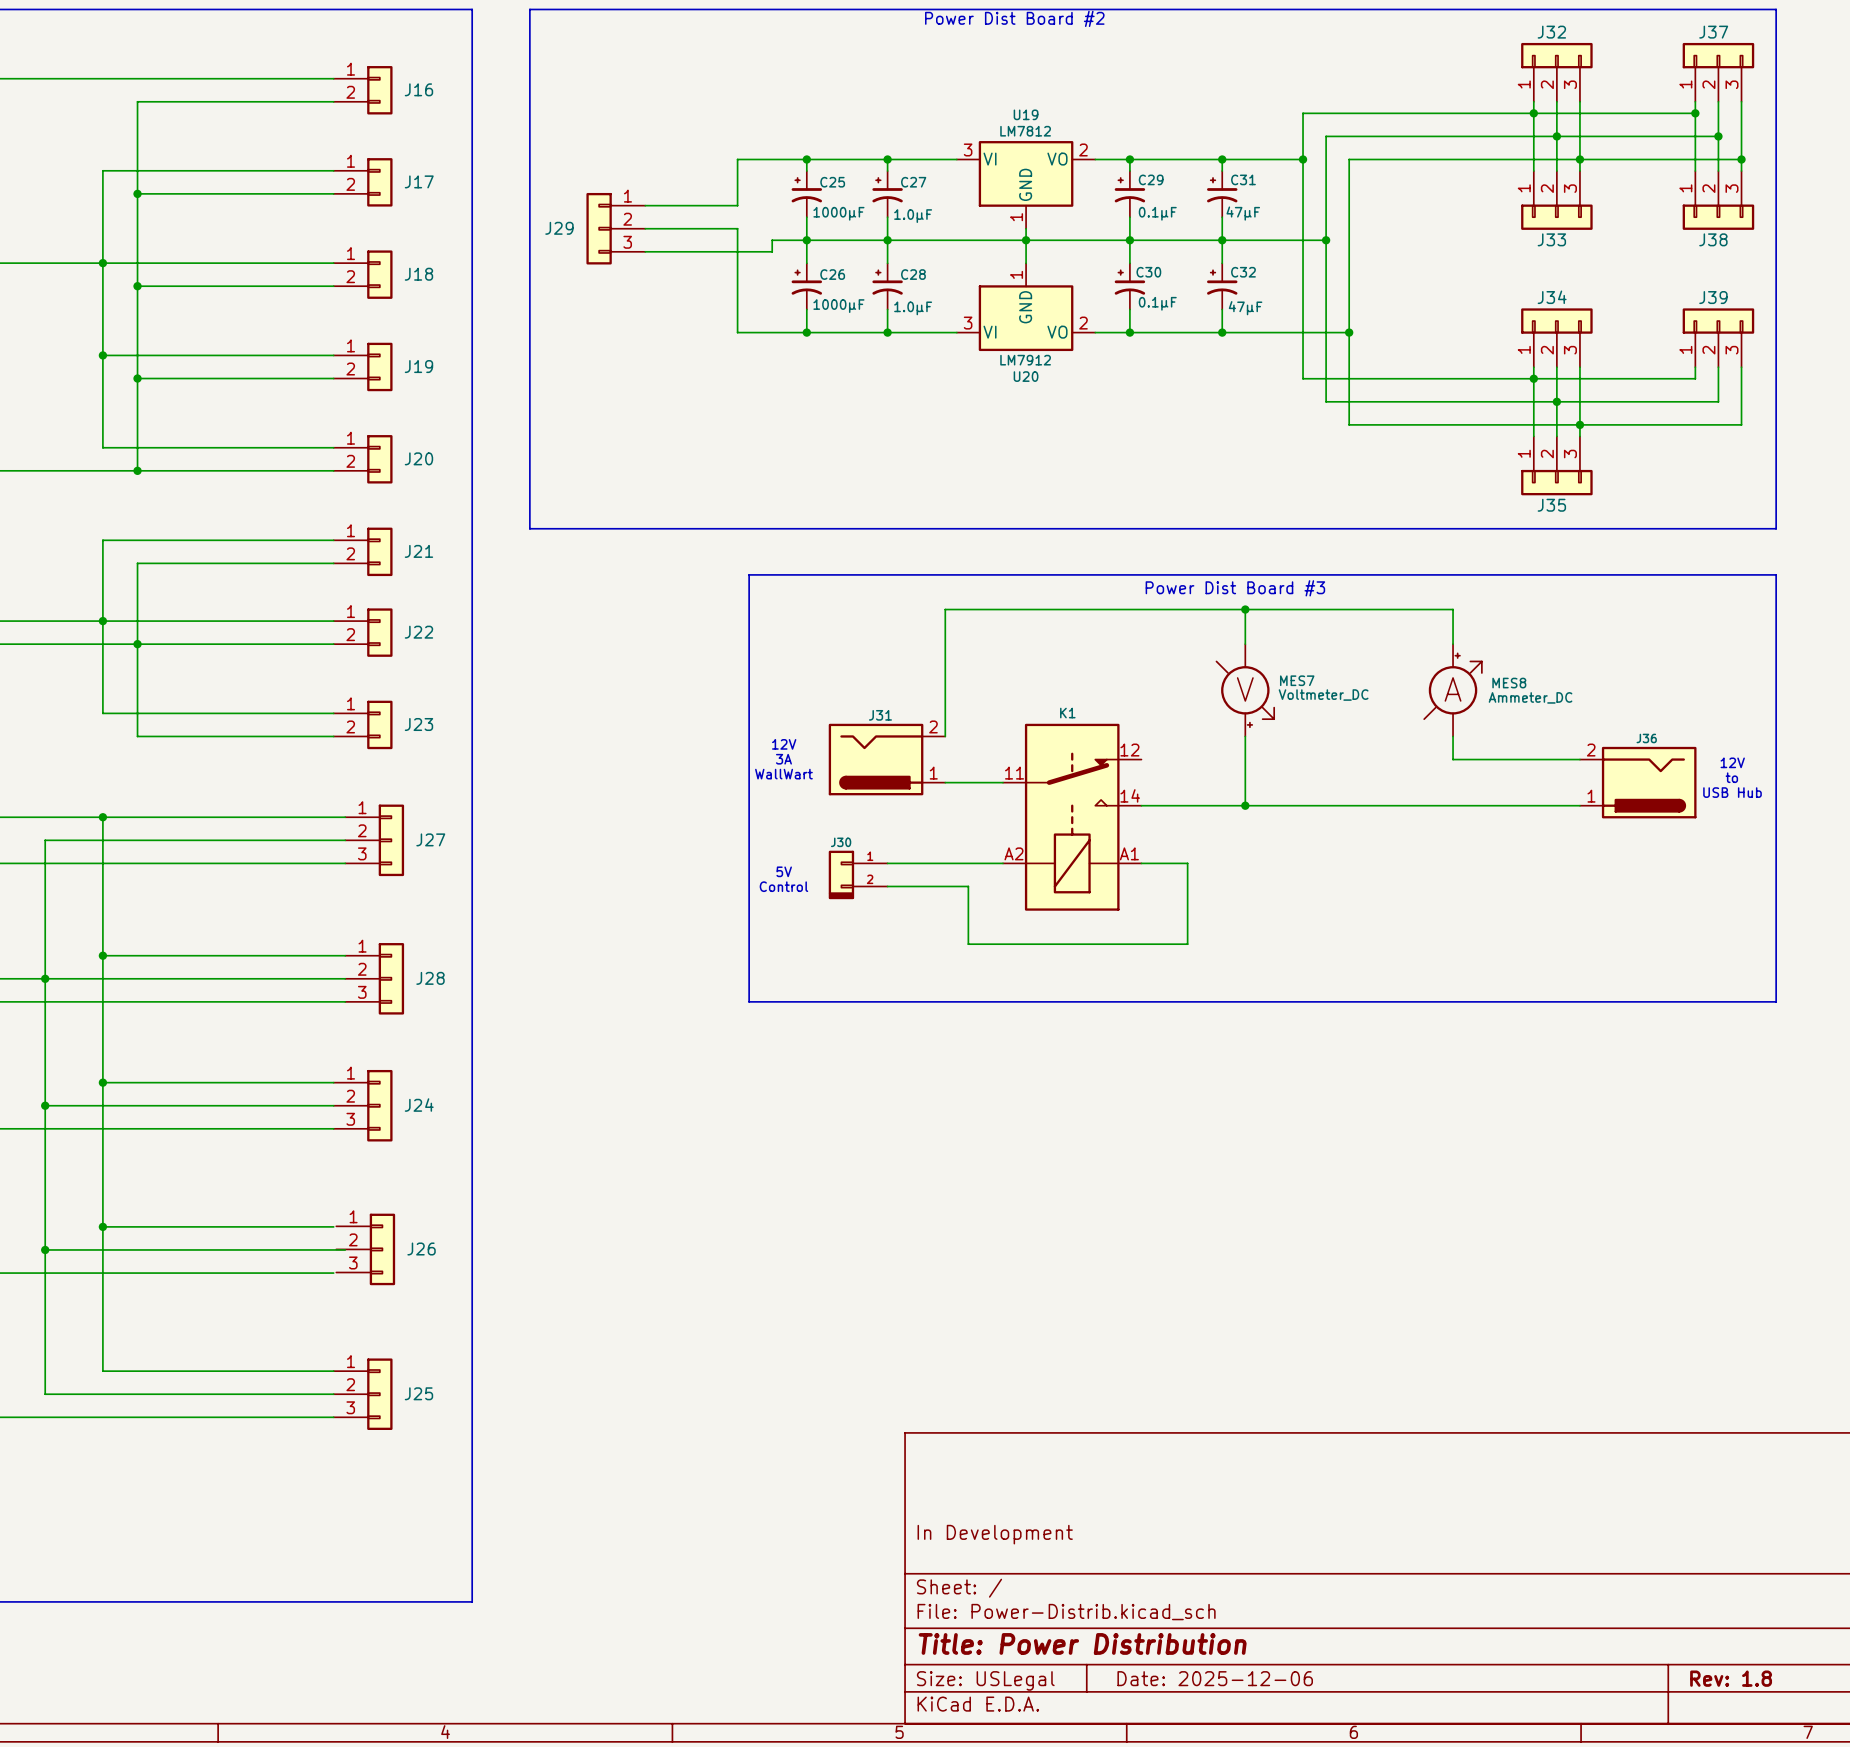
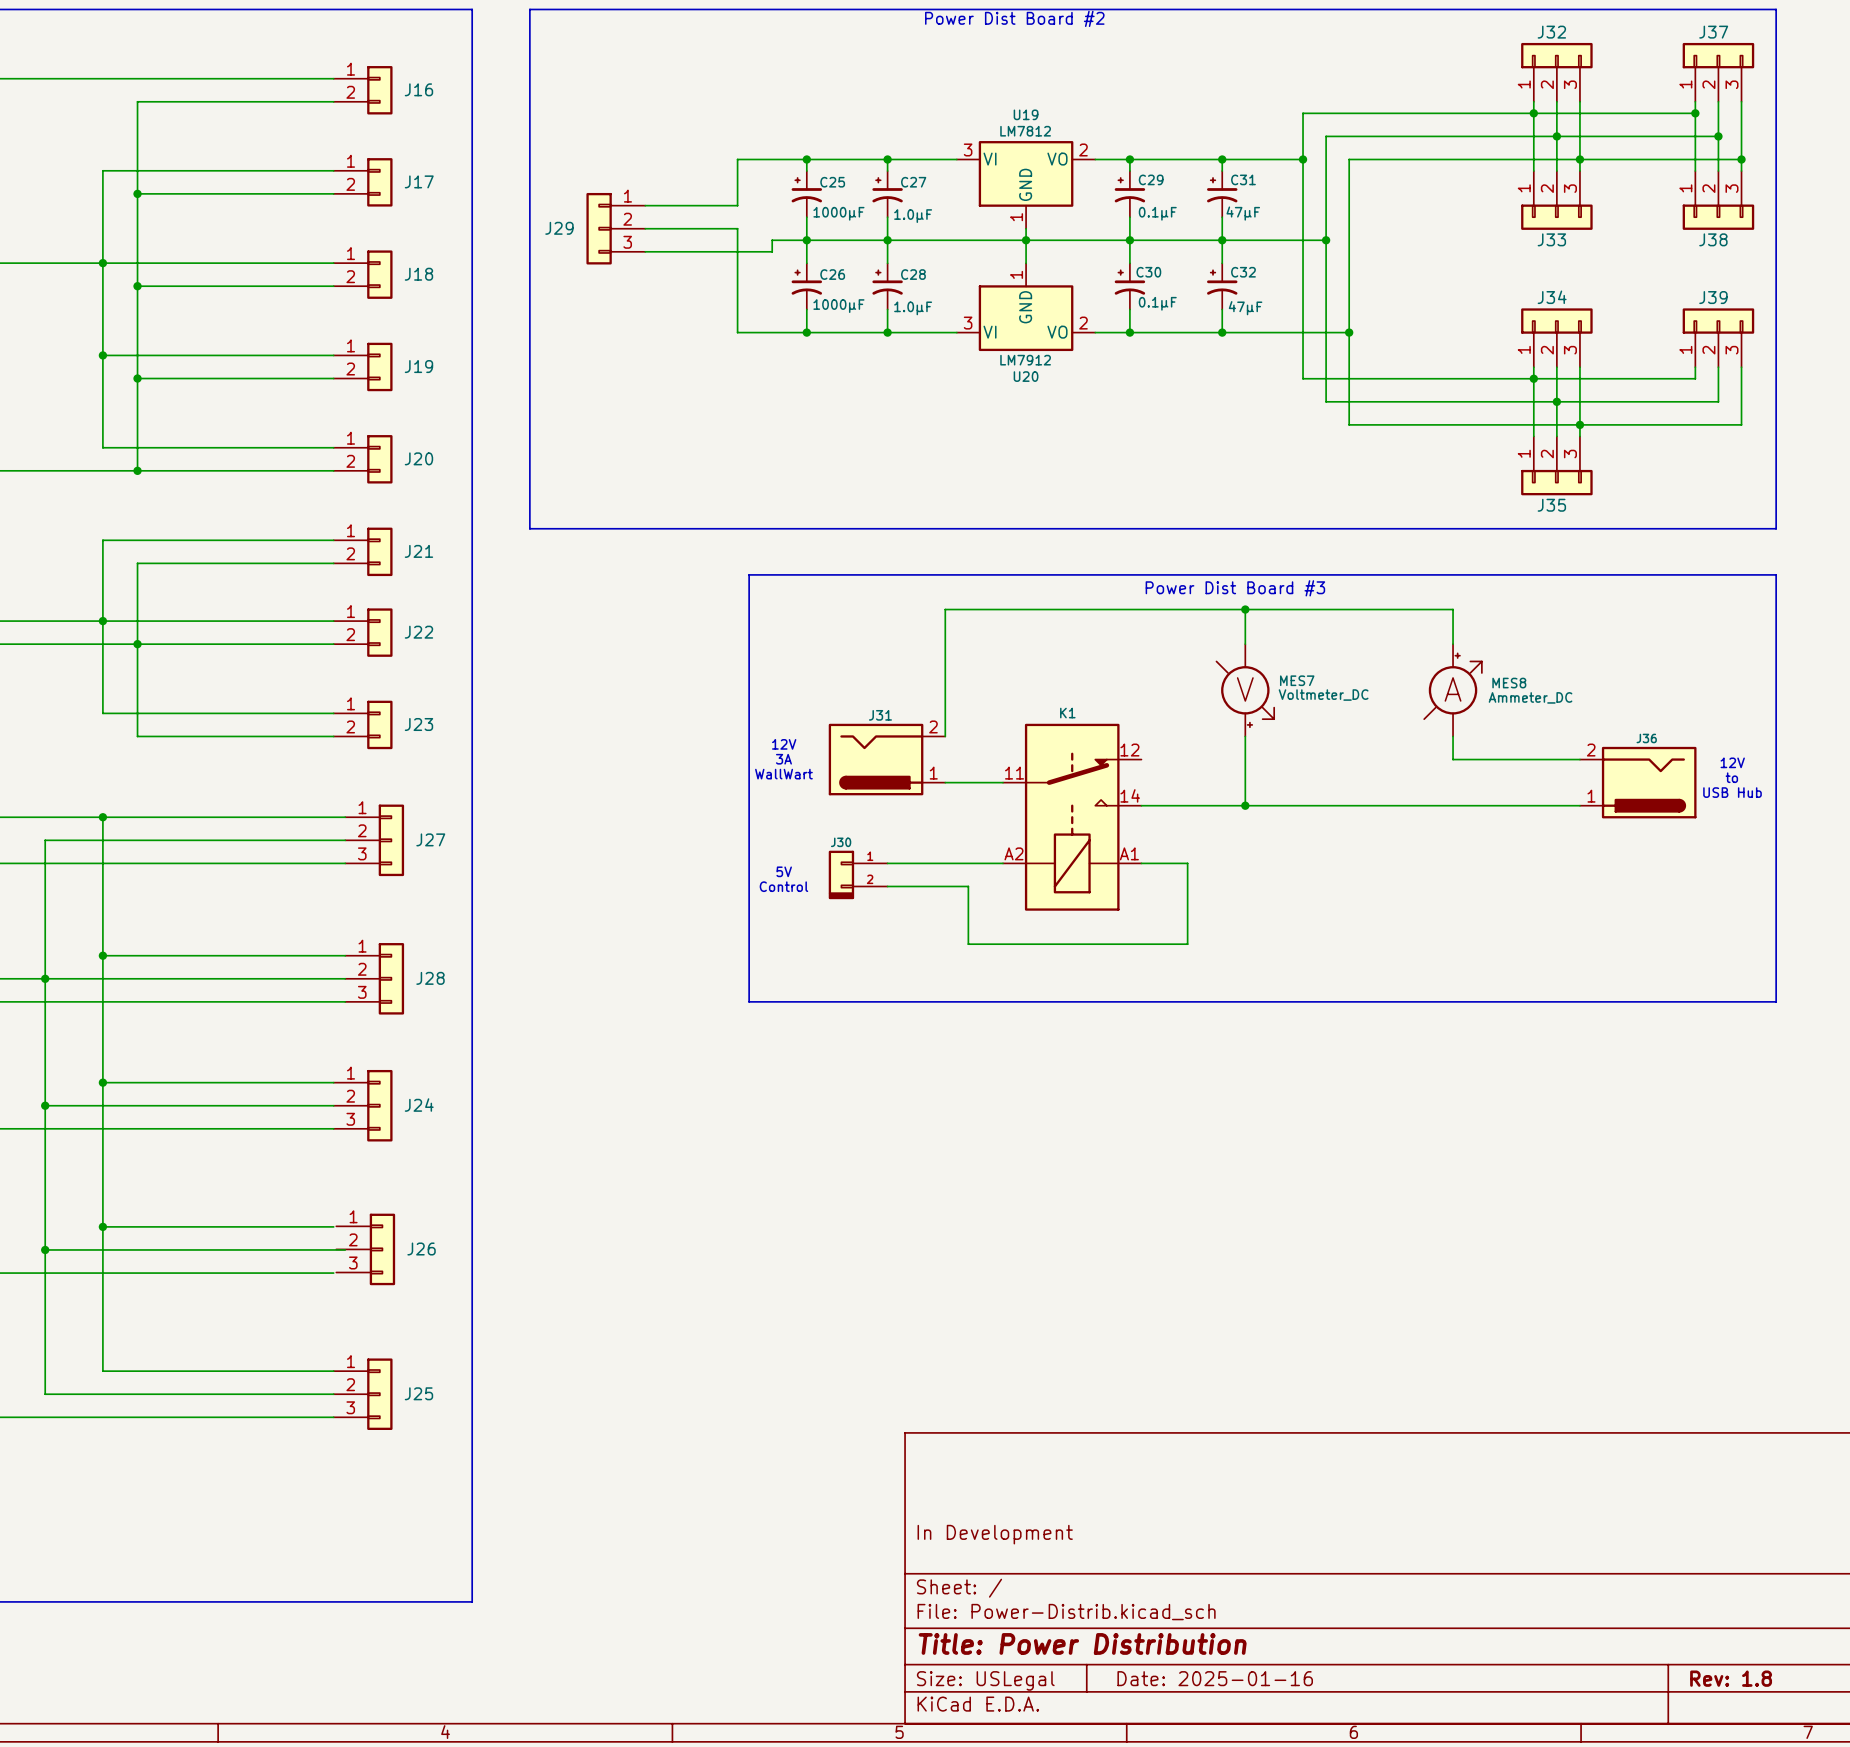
title block: Date: 2025-12-06 (1215, 1678) -> Date: 2025-01-16 (1215, 1678)

